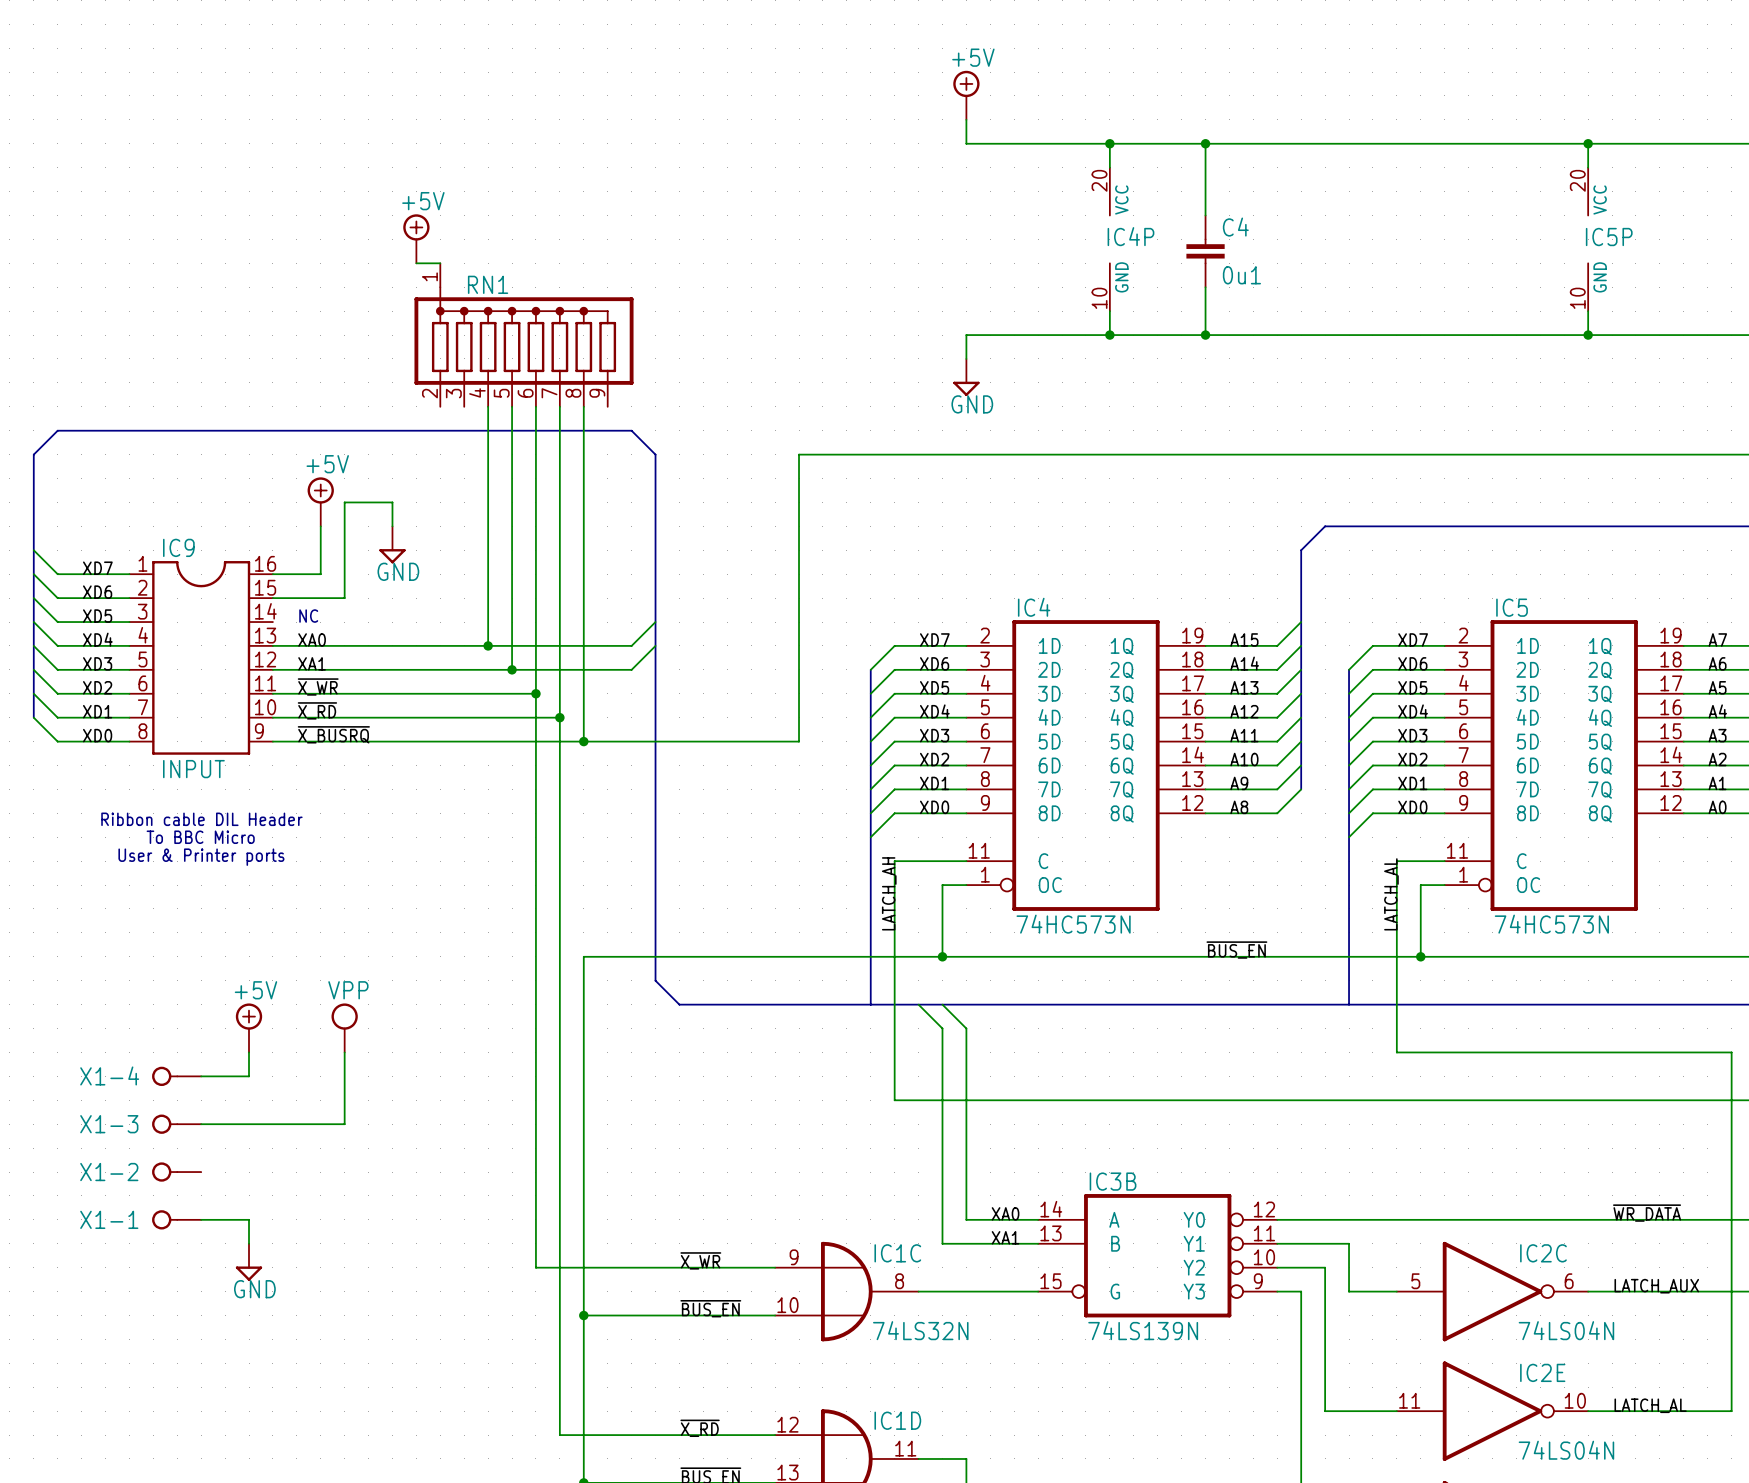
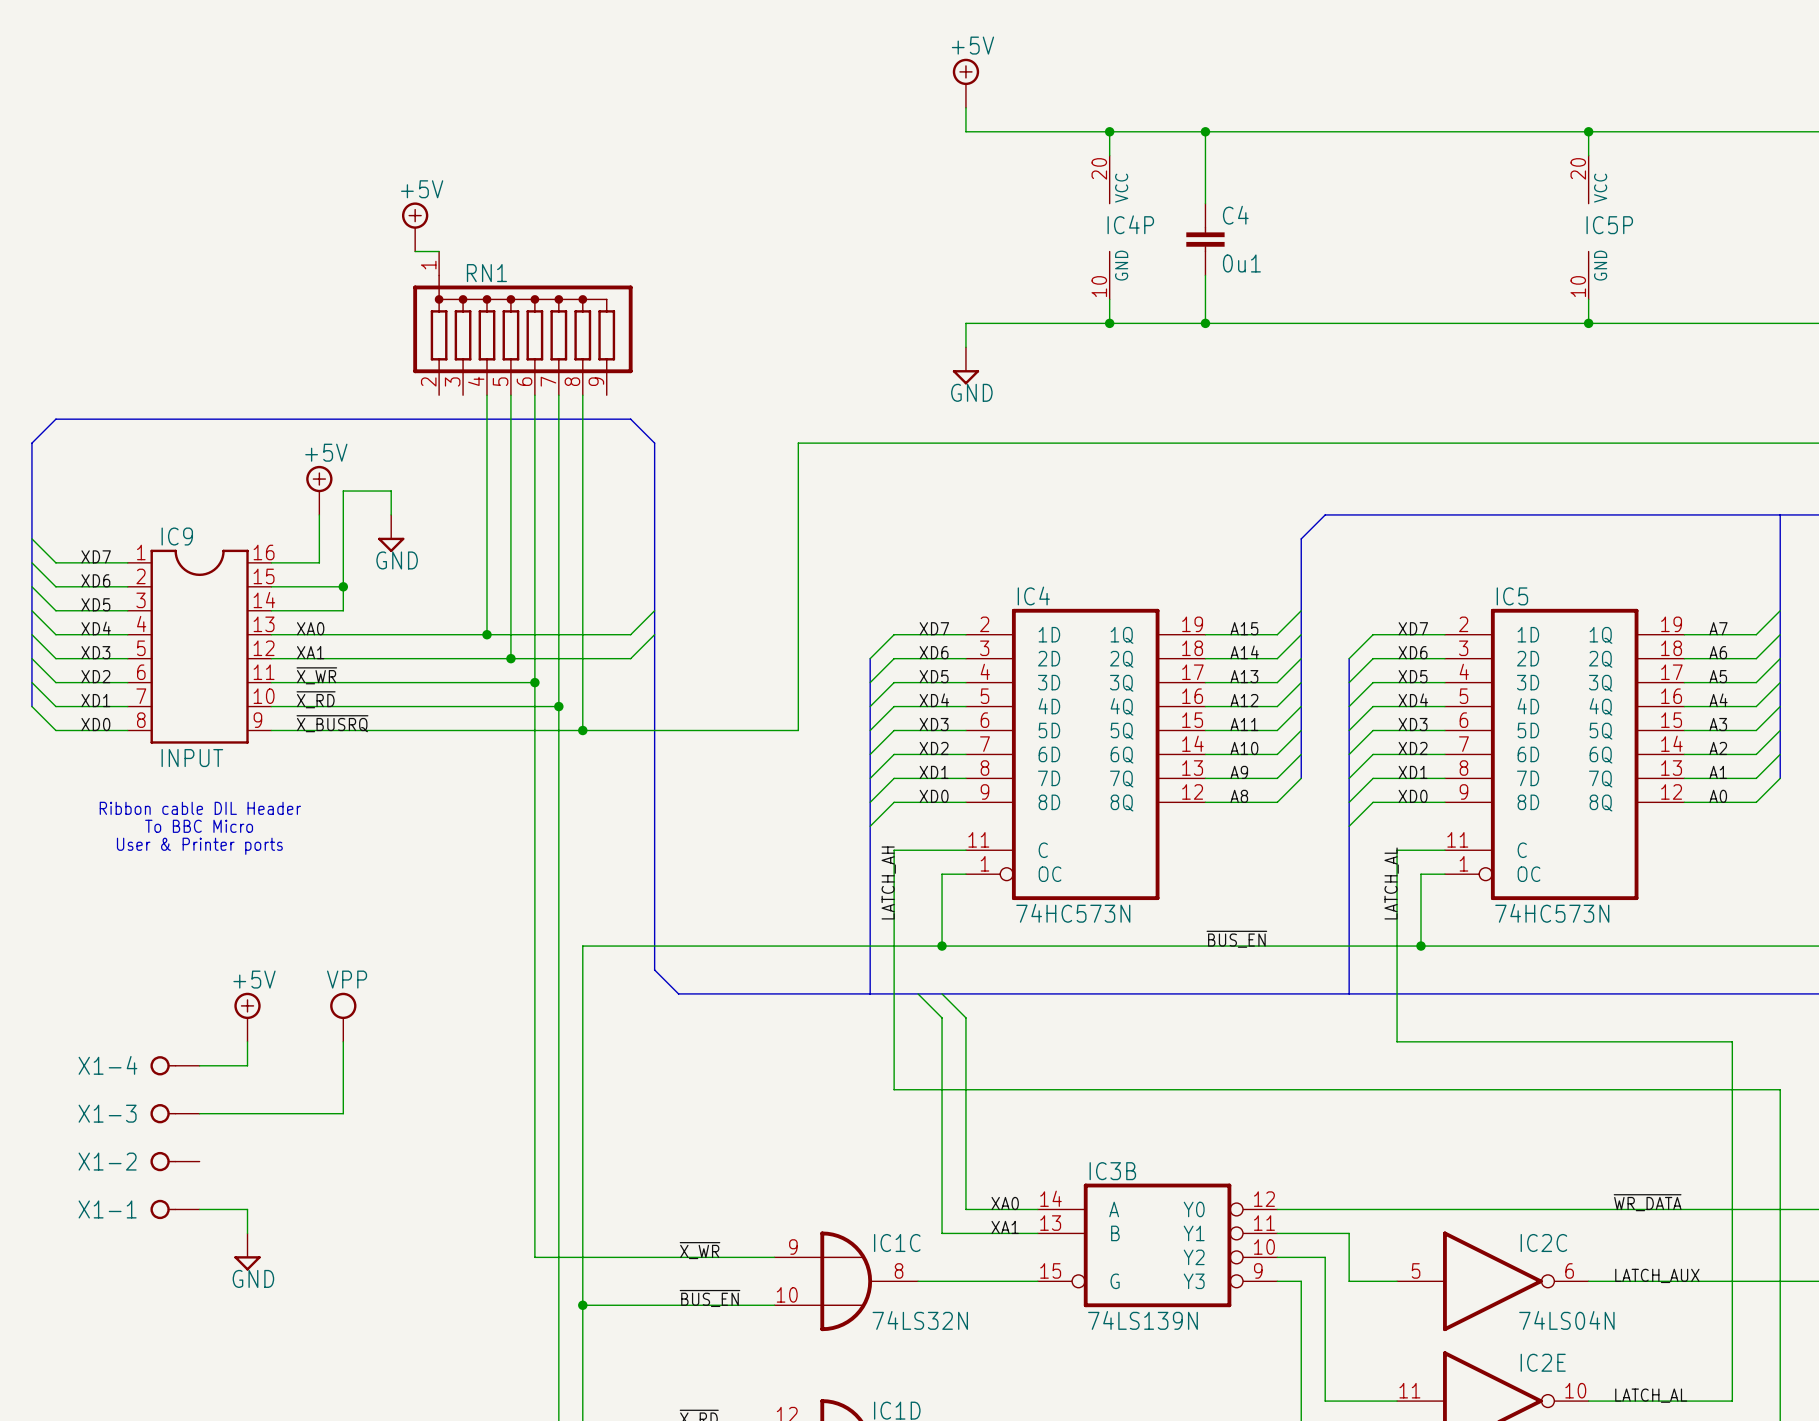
wire: none -> (343, 586) (343, 610) (271, 610)
junction: none -> (343, 586)
text: NC (308, 616) -> none

